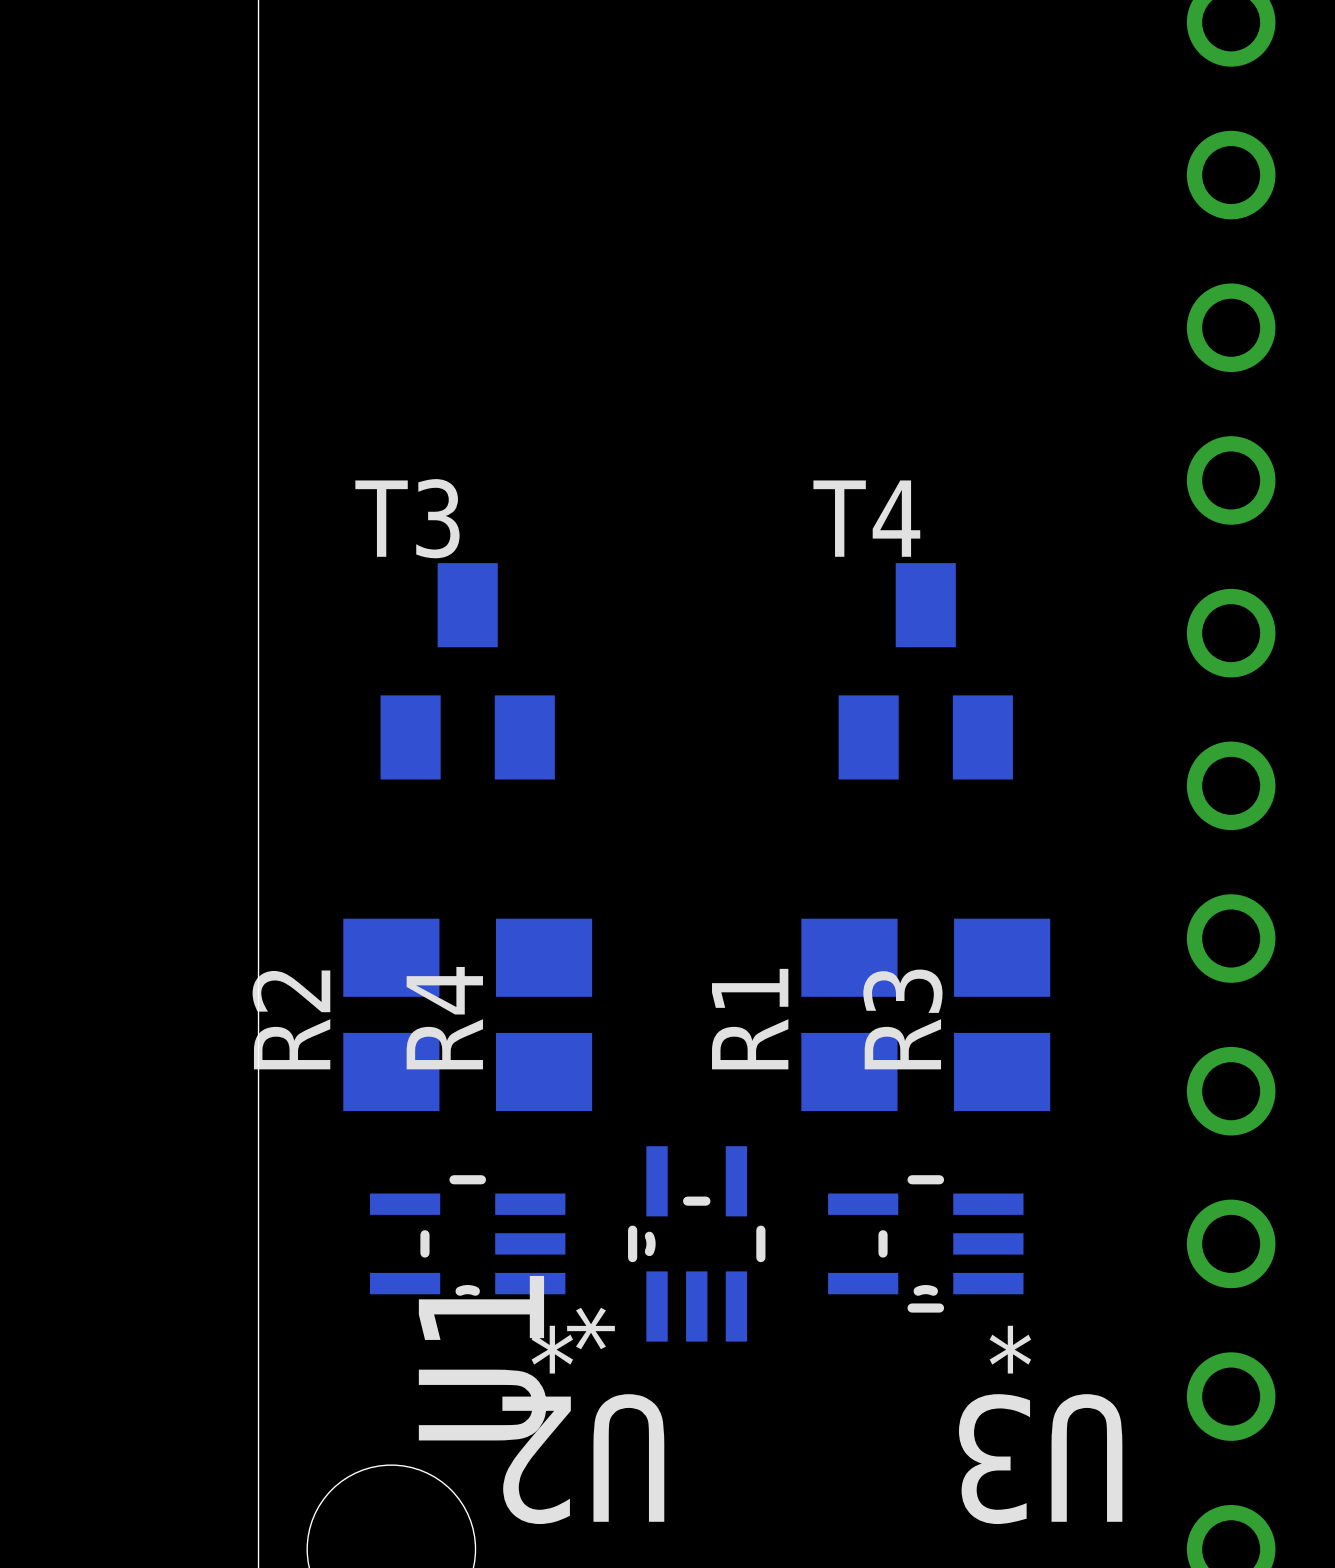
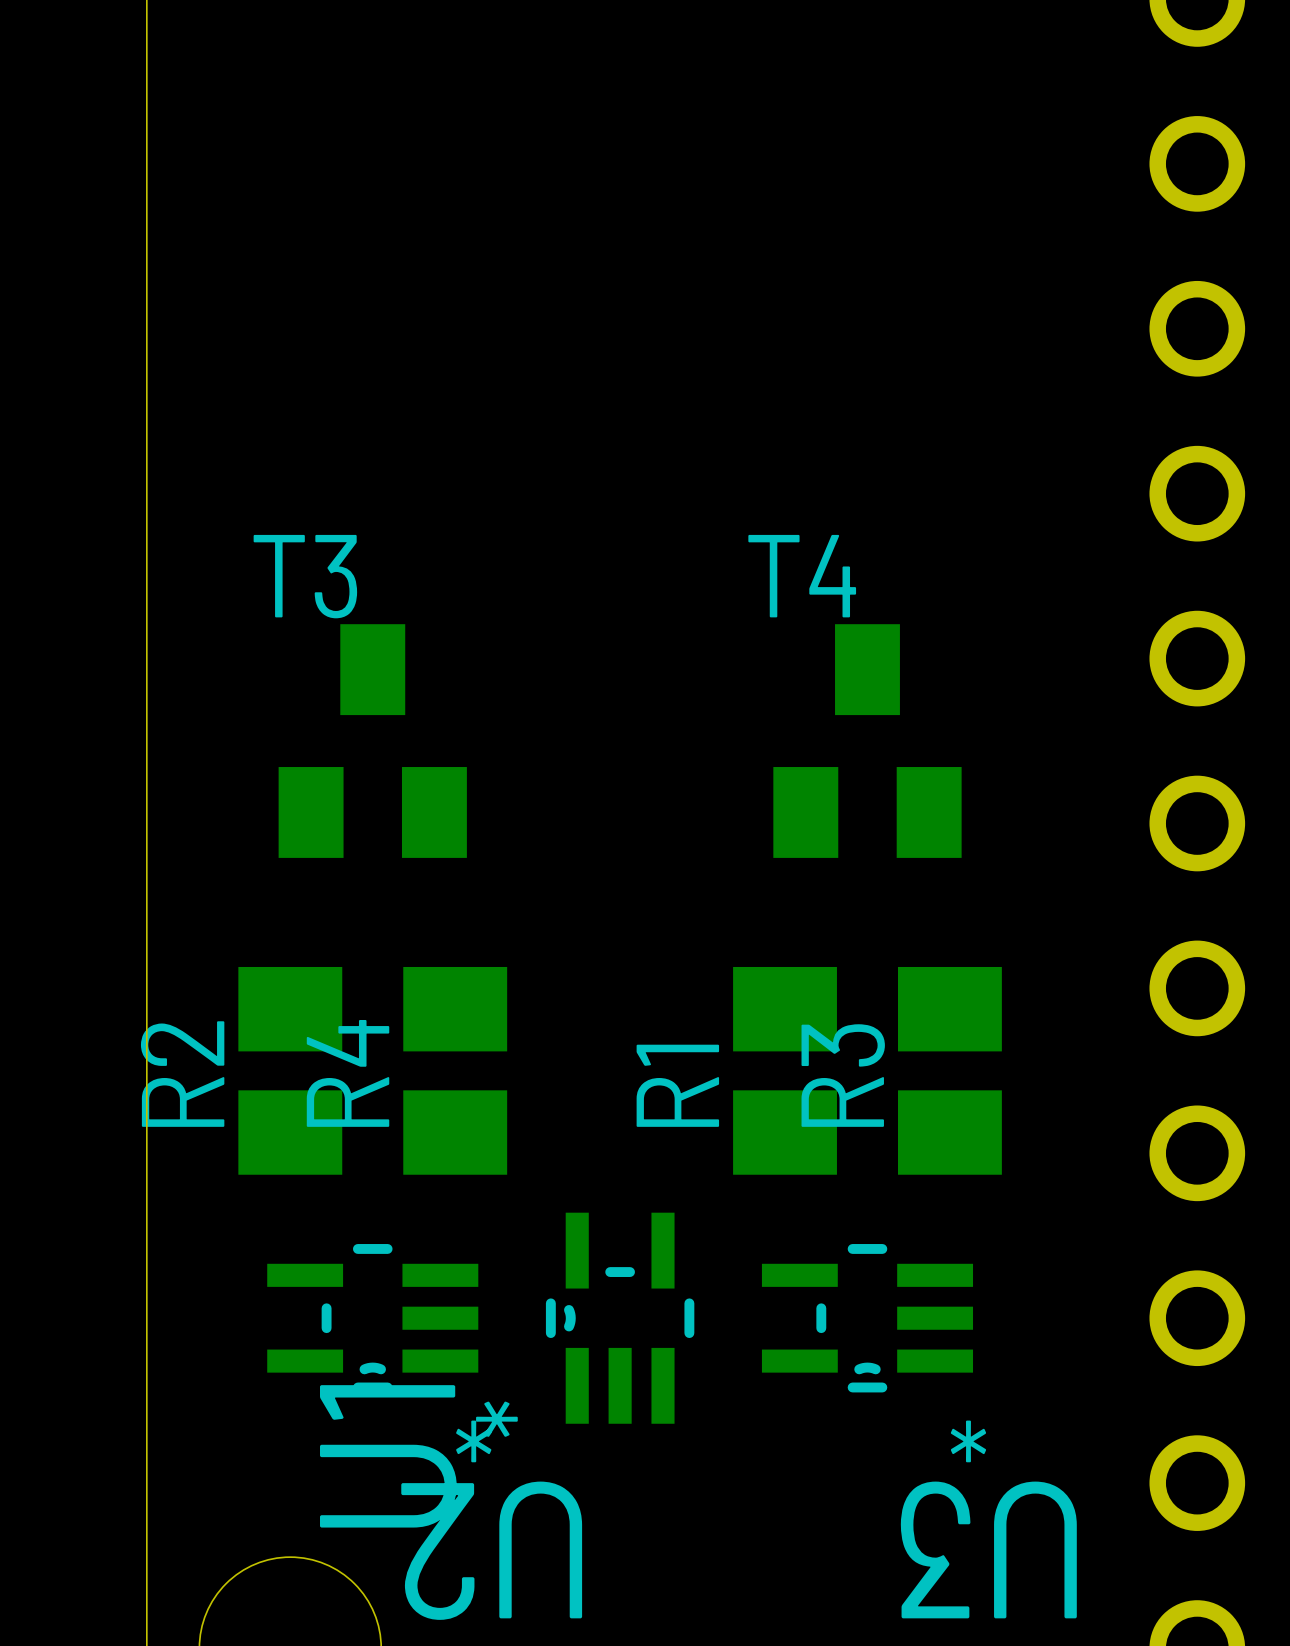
T3 position: (467, 671) -> (372, 741)
T4 position: (925, 671) -> (867, 741)

